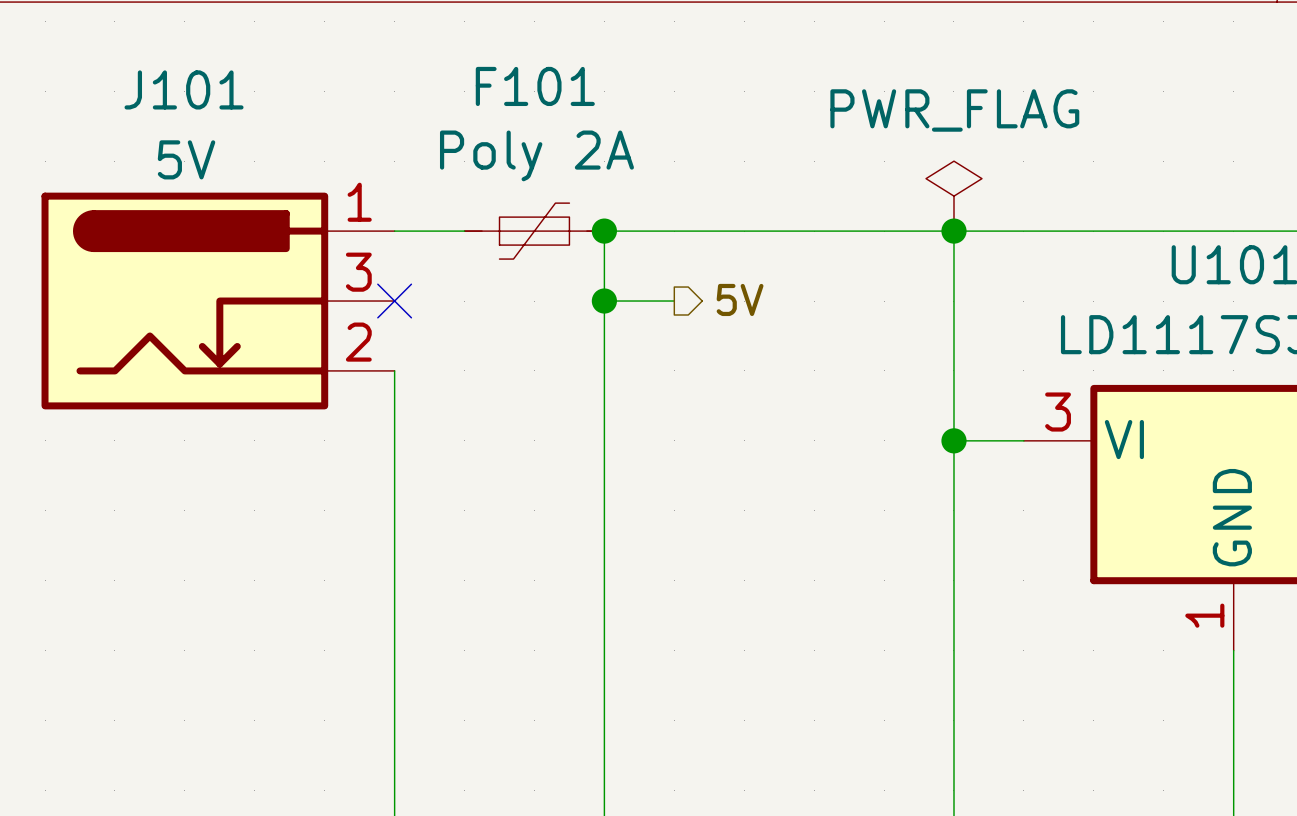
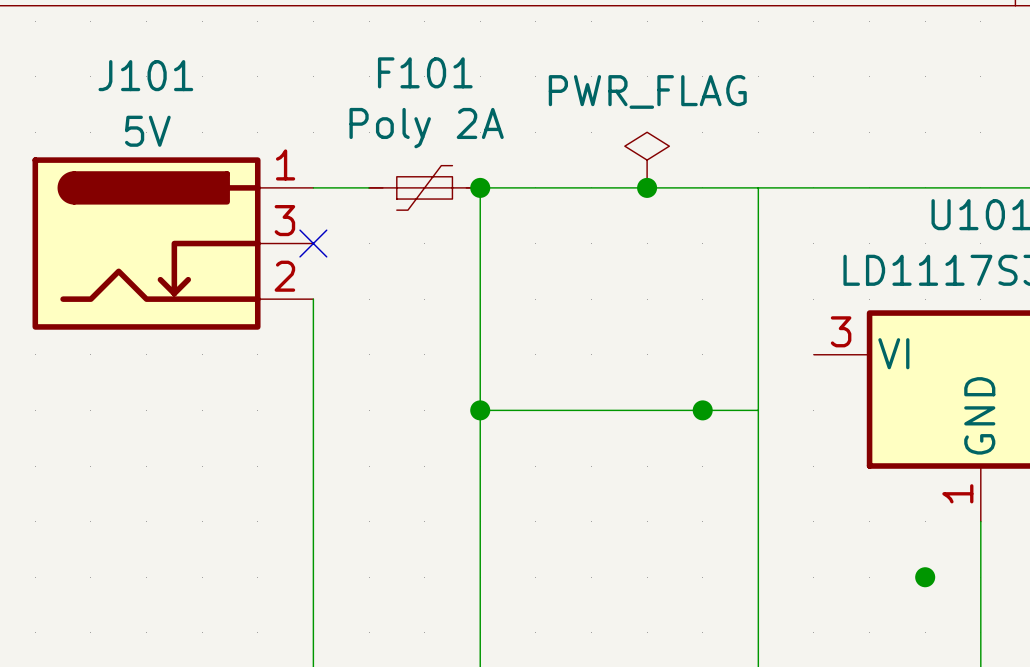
power symbol position: PWR_FLAG (953, 196) -> PWR_FLAG (647, 160)
junction: none -> (647, 187)
junction: (953, 231) -> none
hierarchical label: 5V (740, 299) -> none
wire: (604, 301) (674, 301) -> none
junction: (604, 301) -> none
wire: (953, 440) (1023, 440) -> none
junction position: (953, 440) -> (702, 410)
wire: none -> (480, 410) (758, 410)
junction: none -> (480, 410)
junction: none -> (925, 577)

